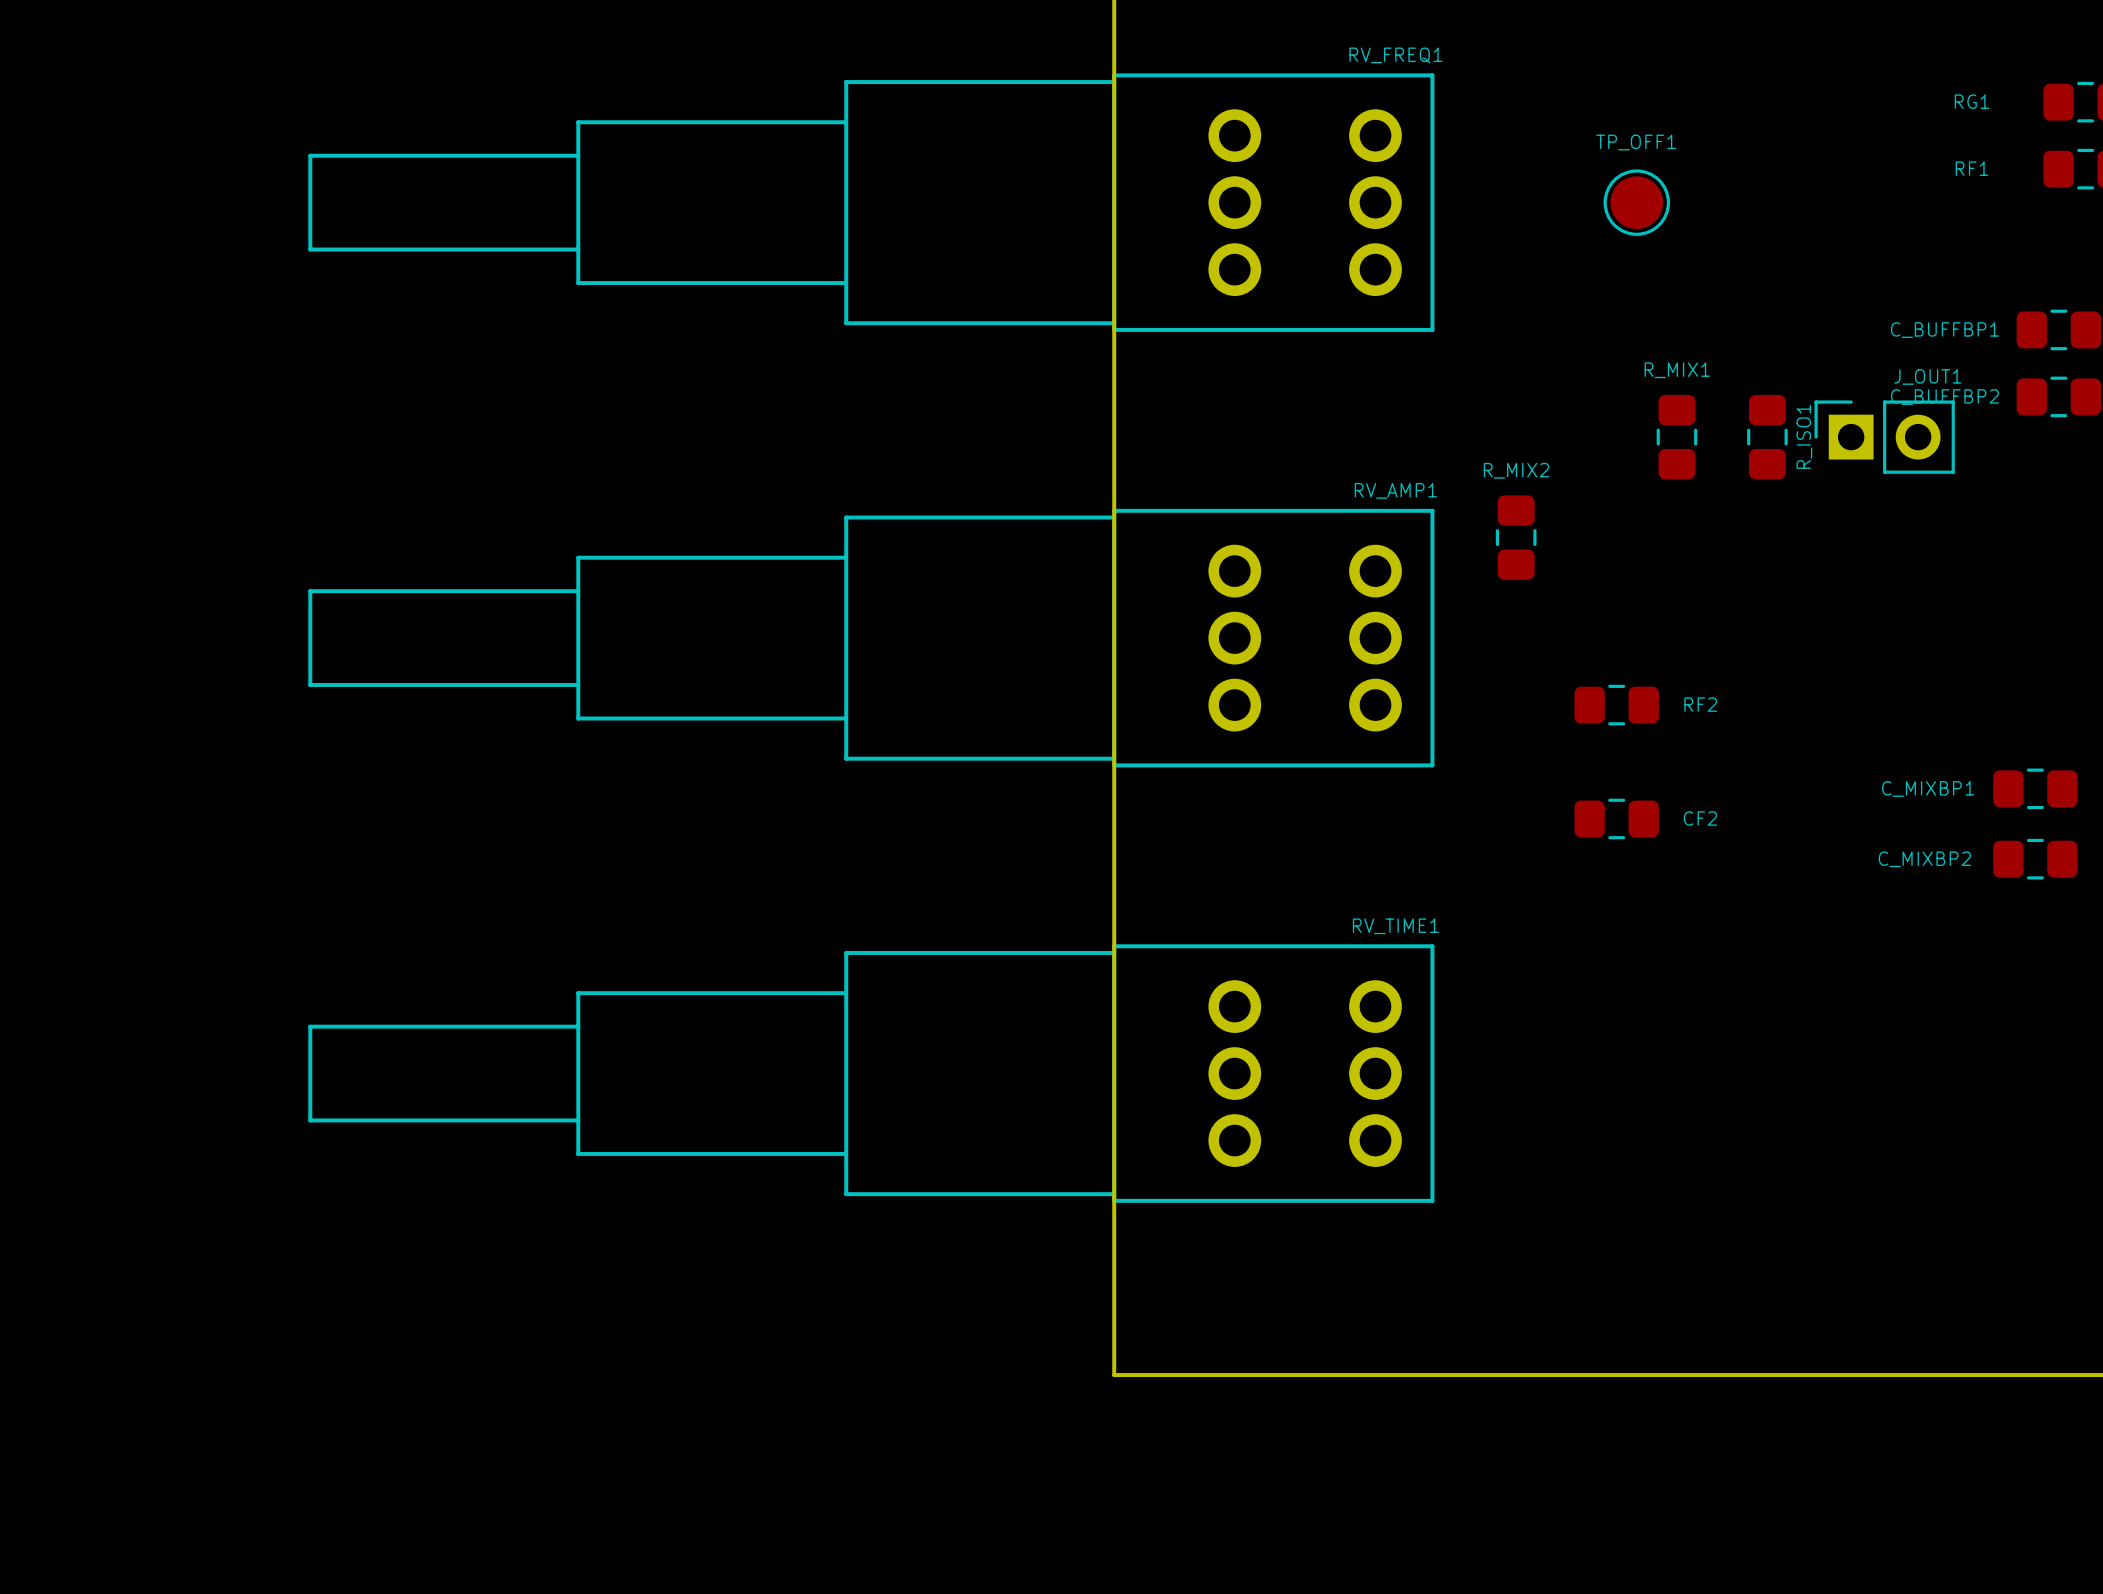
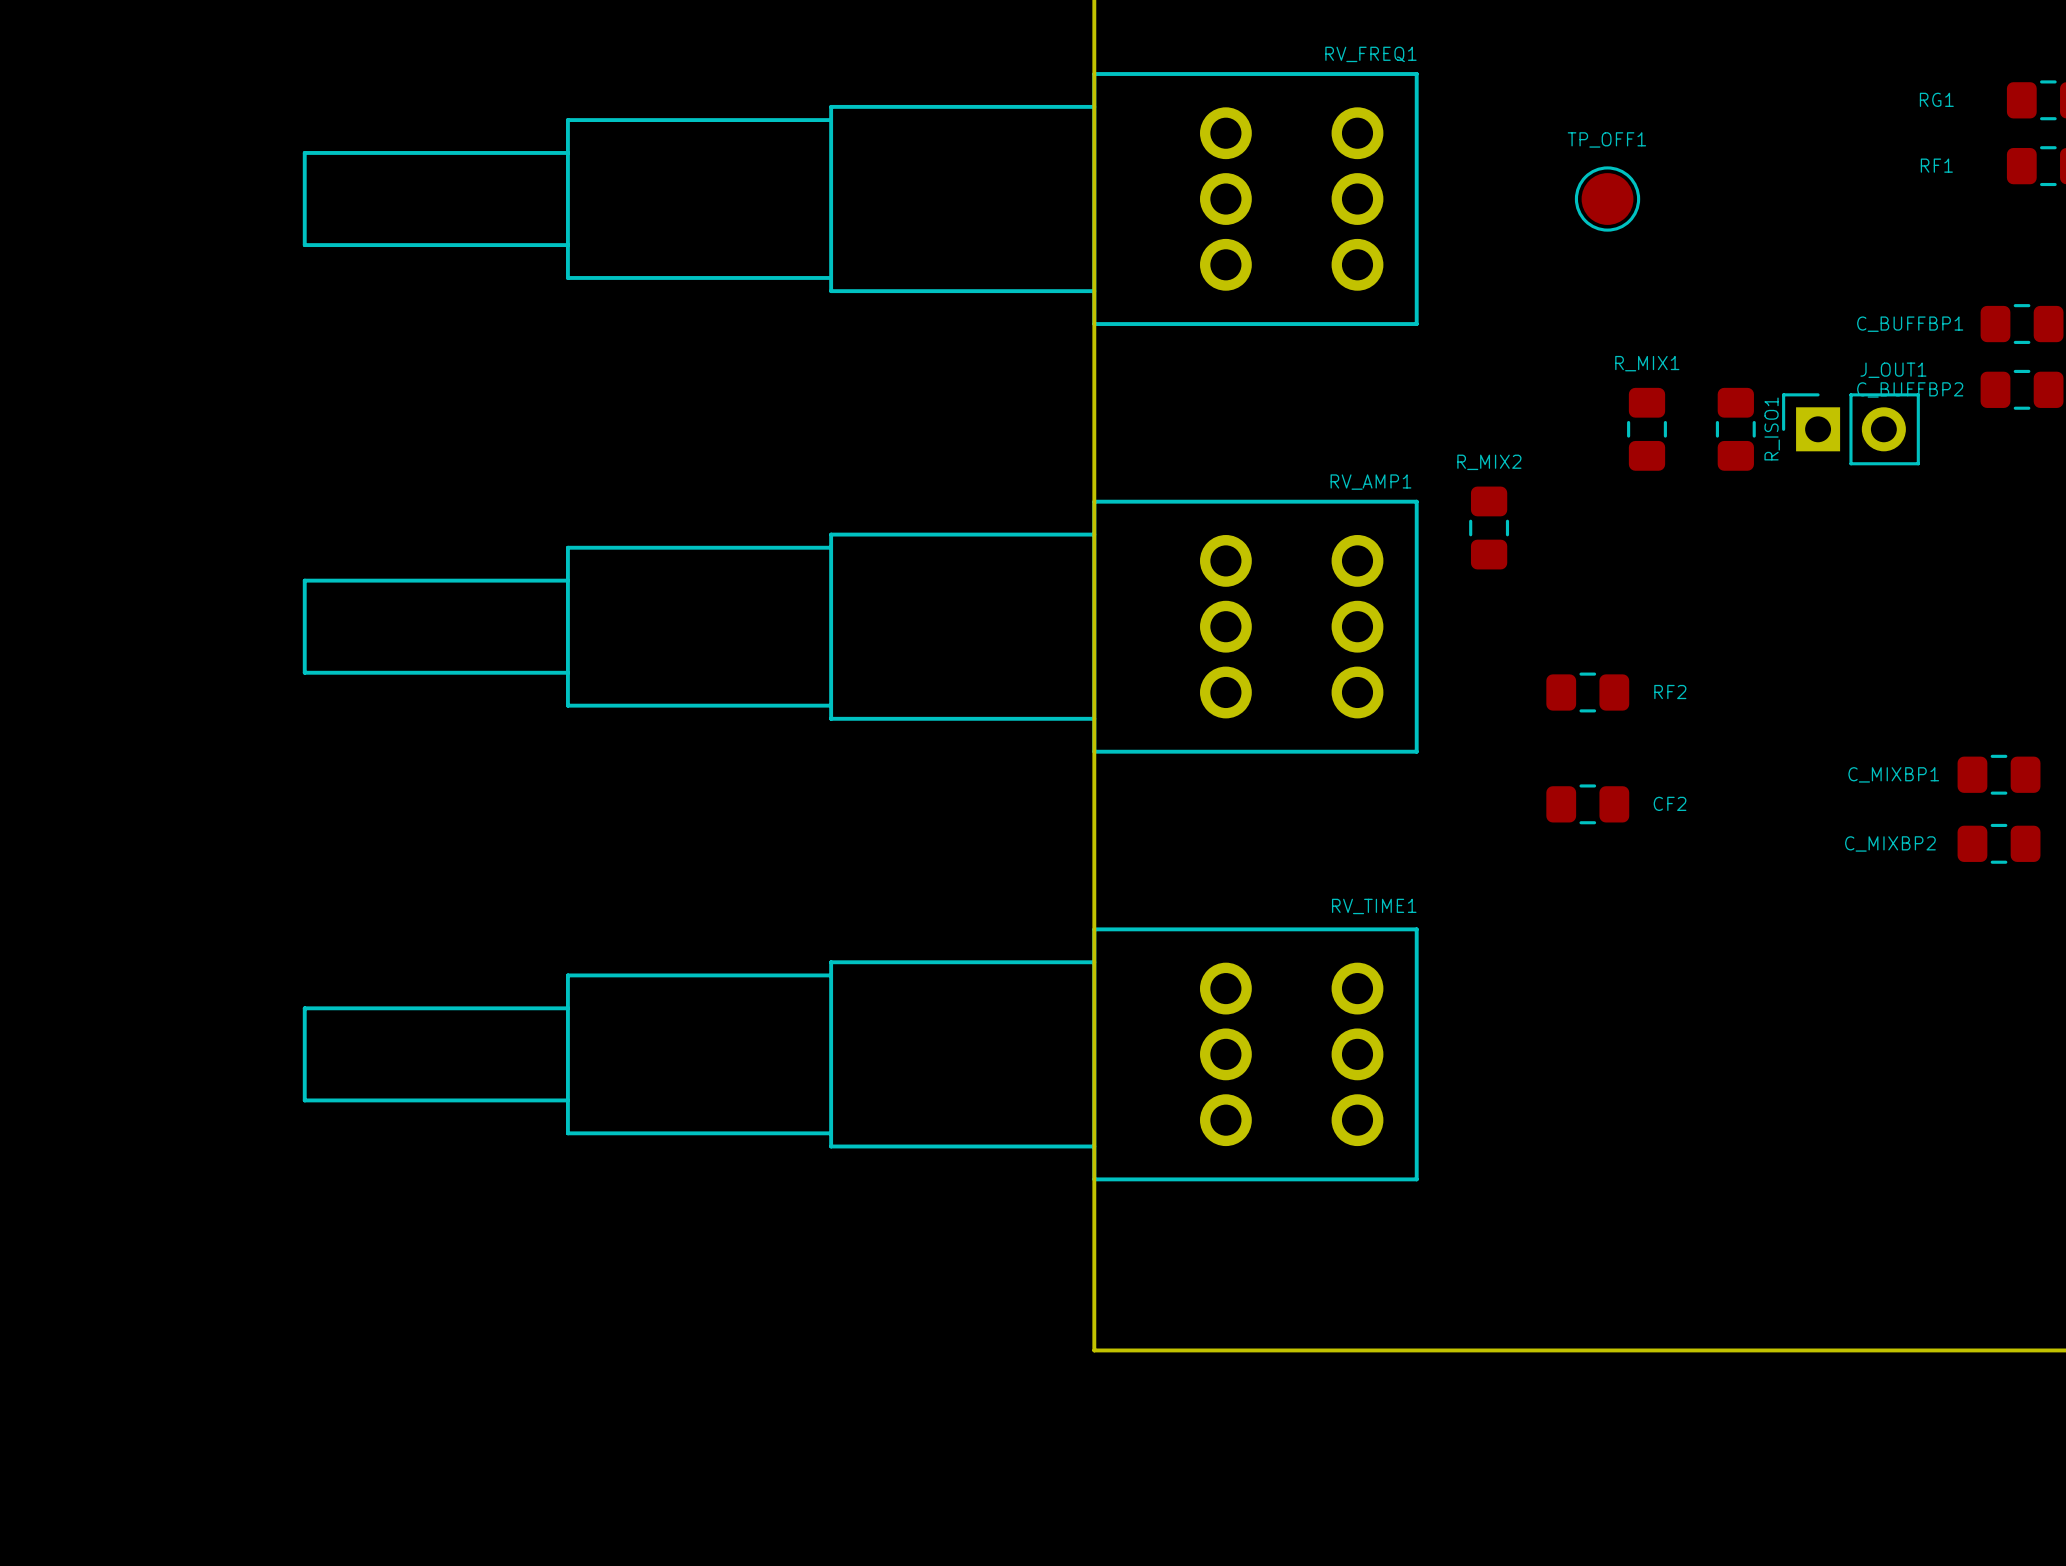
RV_FREQ1 footprint: [308, 73, 1435, 332] -> [302, 72, 1419, 326]
RV_AMP1 footprint: [308, 508, 1435, 768] -> [302, 499, 1419, 754]
RV_TIME1 footprint: [308, 944, 1435, 1203] -> [302, 927, 1419, 1182]

